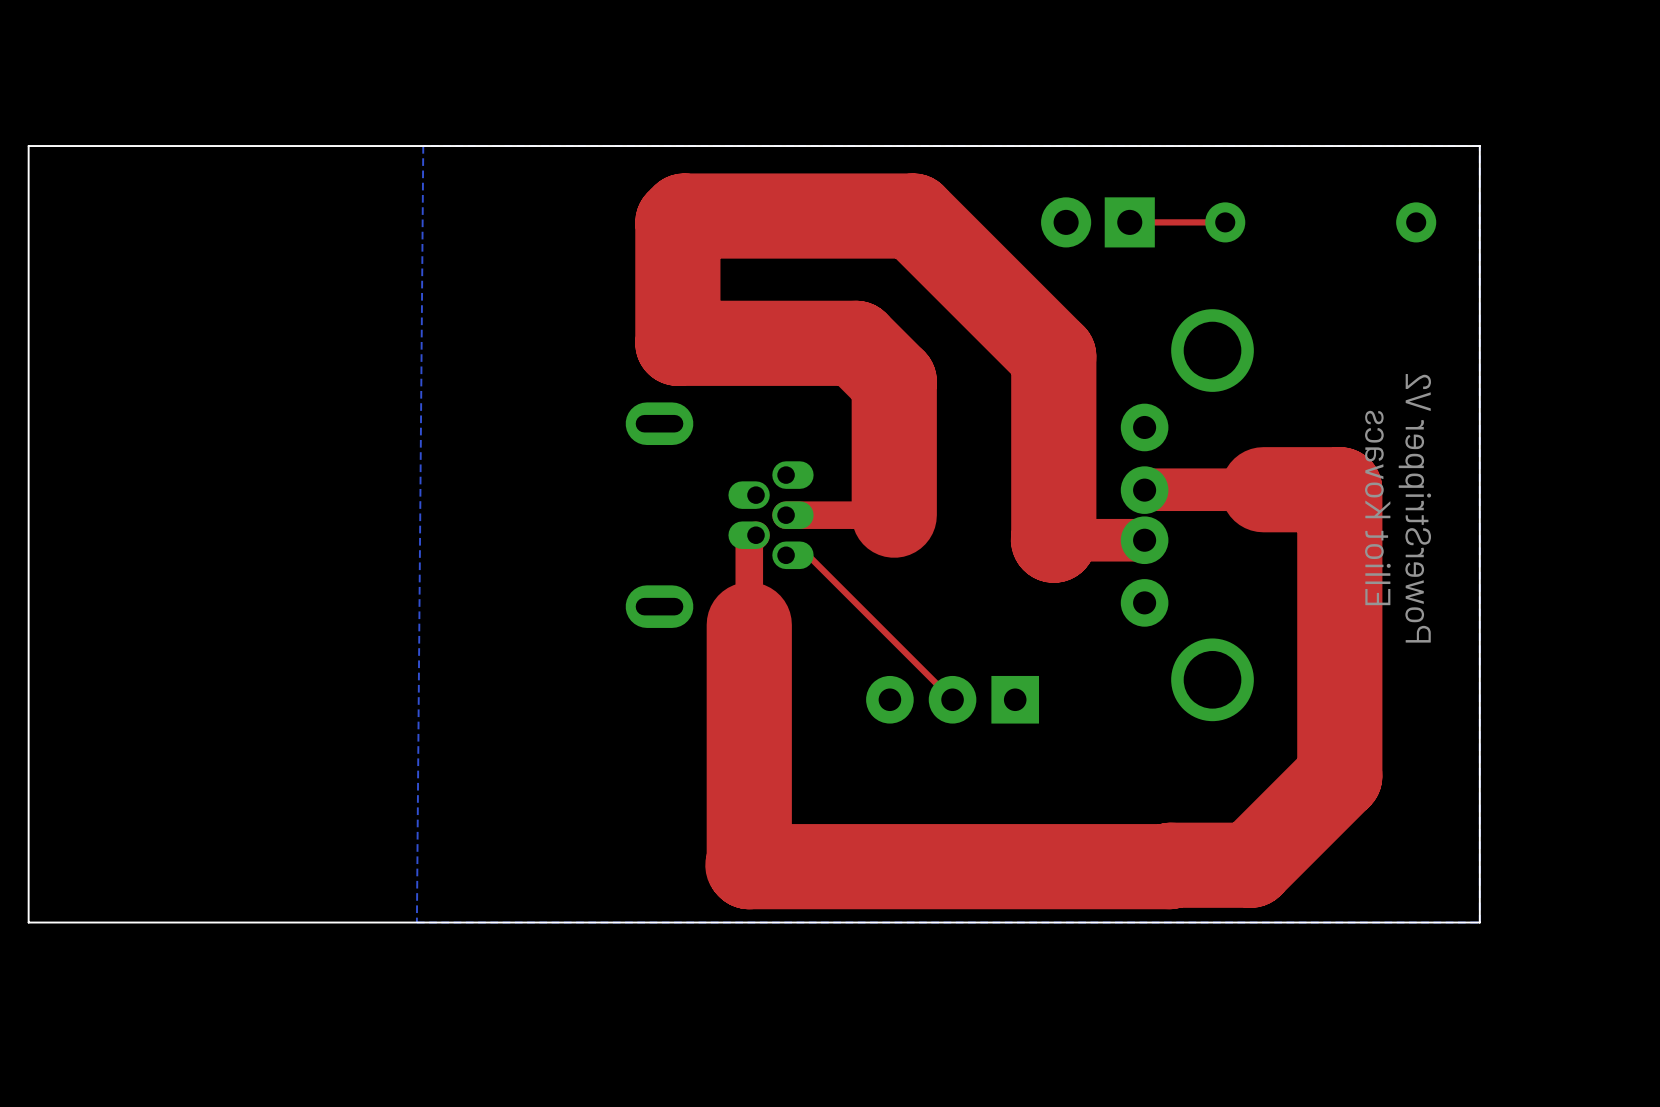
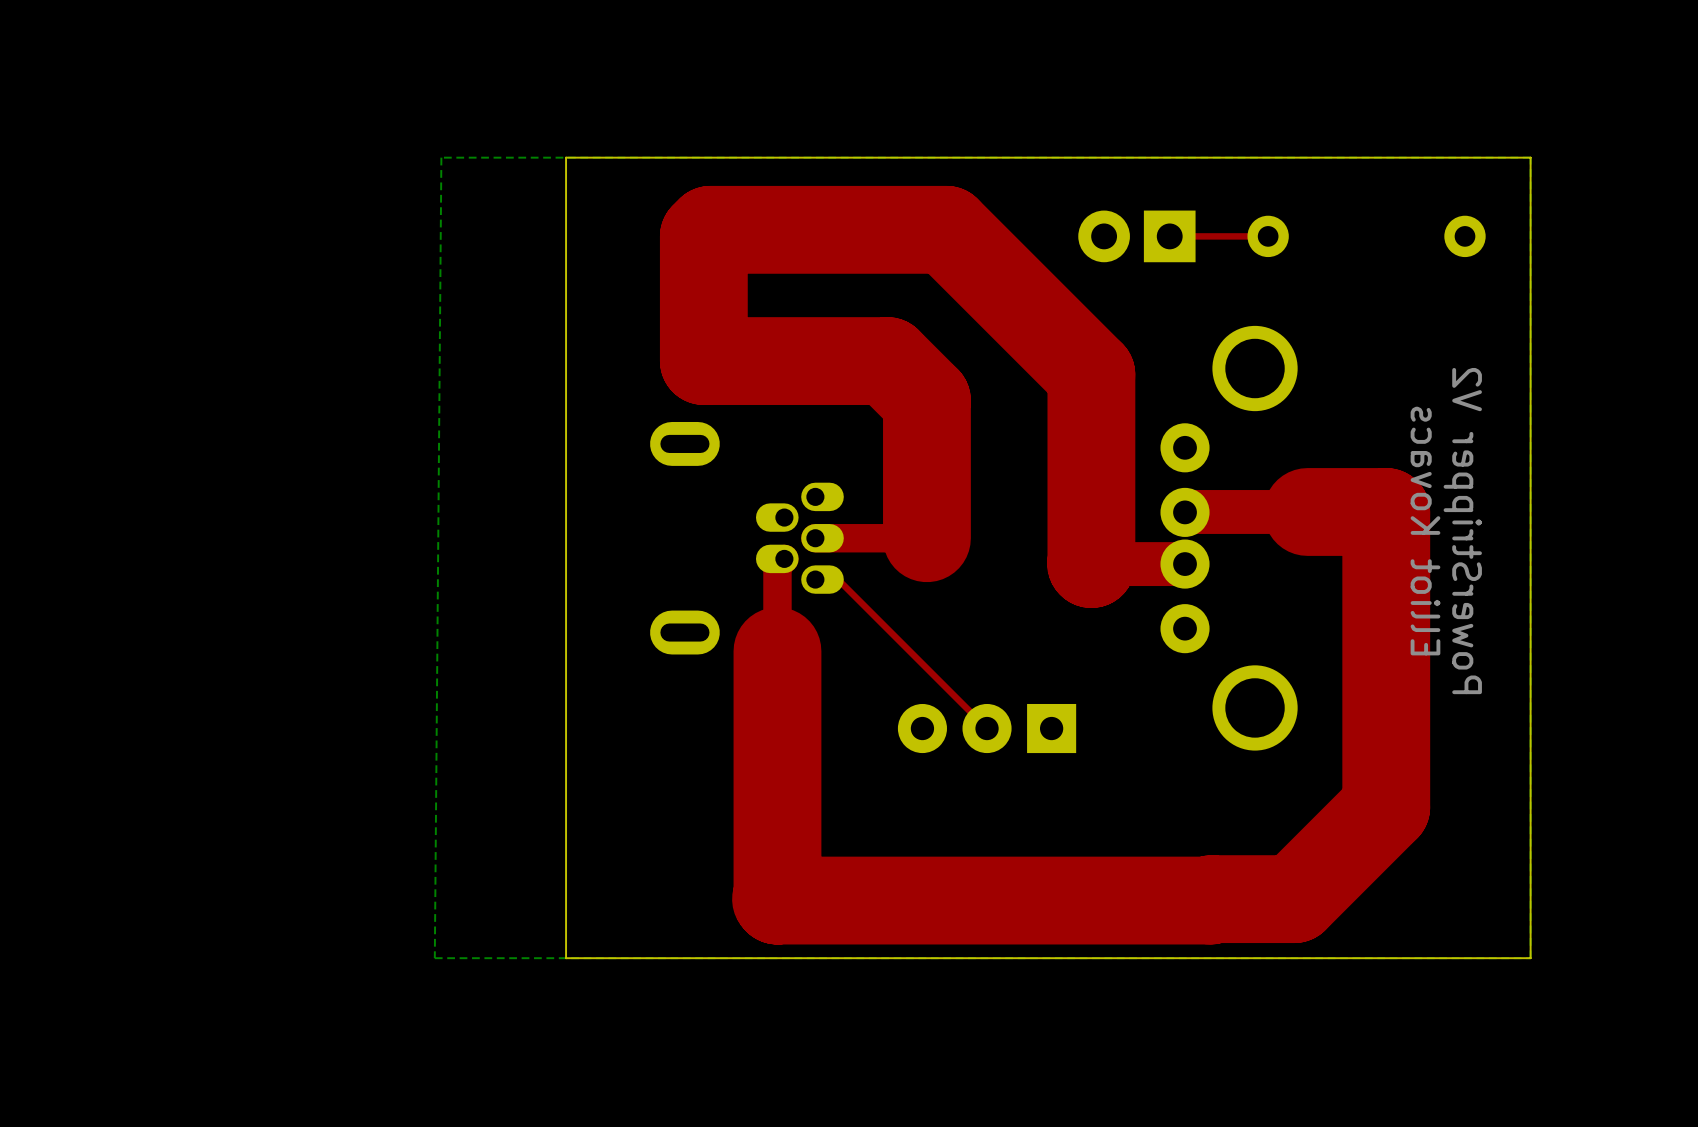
board edge: (544, 146) (28, 146) (28, 922) (544, 922) -> (566, 157) (566, 958)

